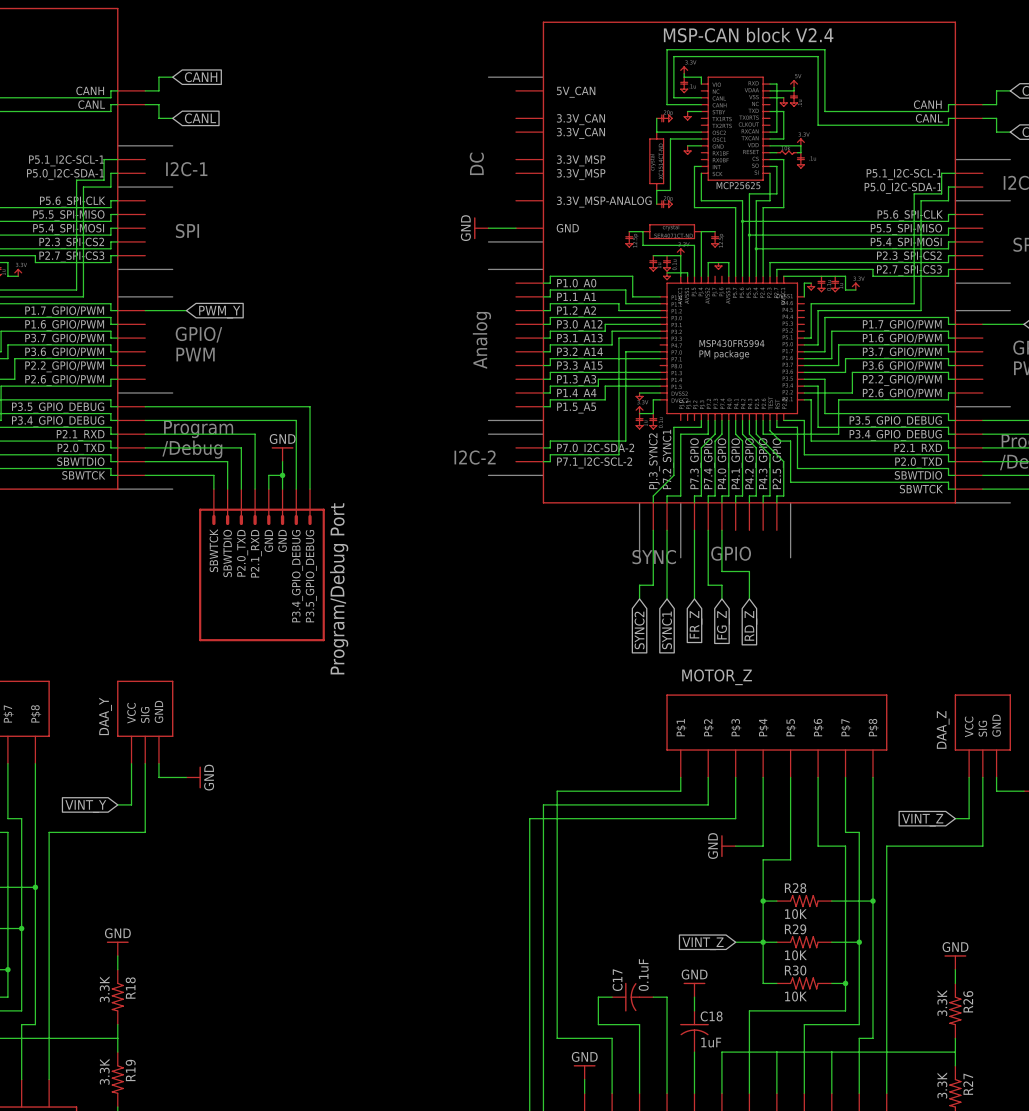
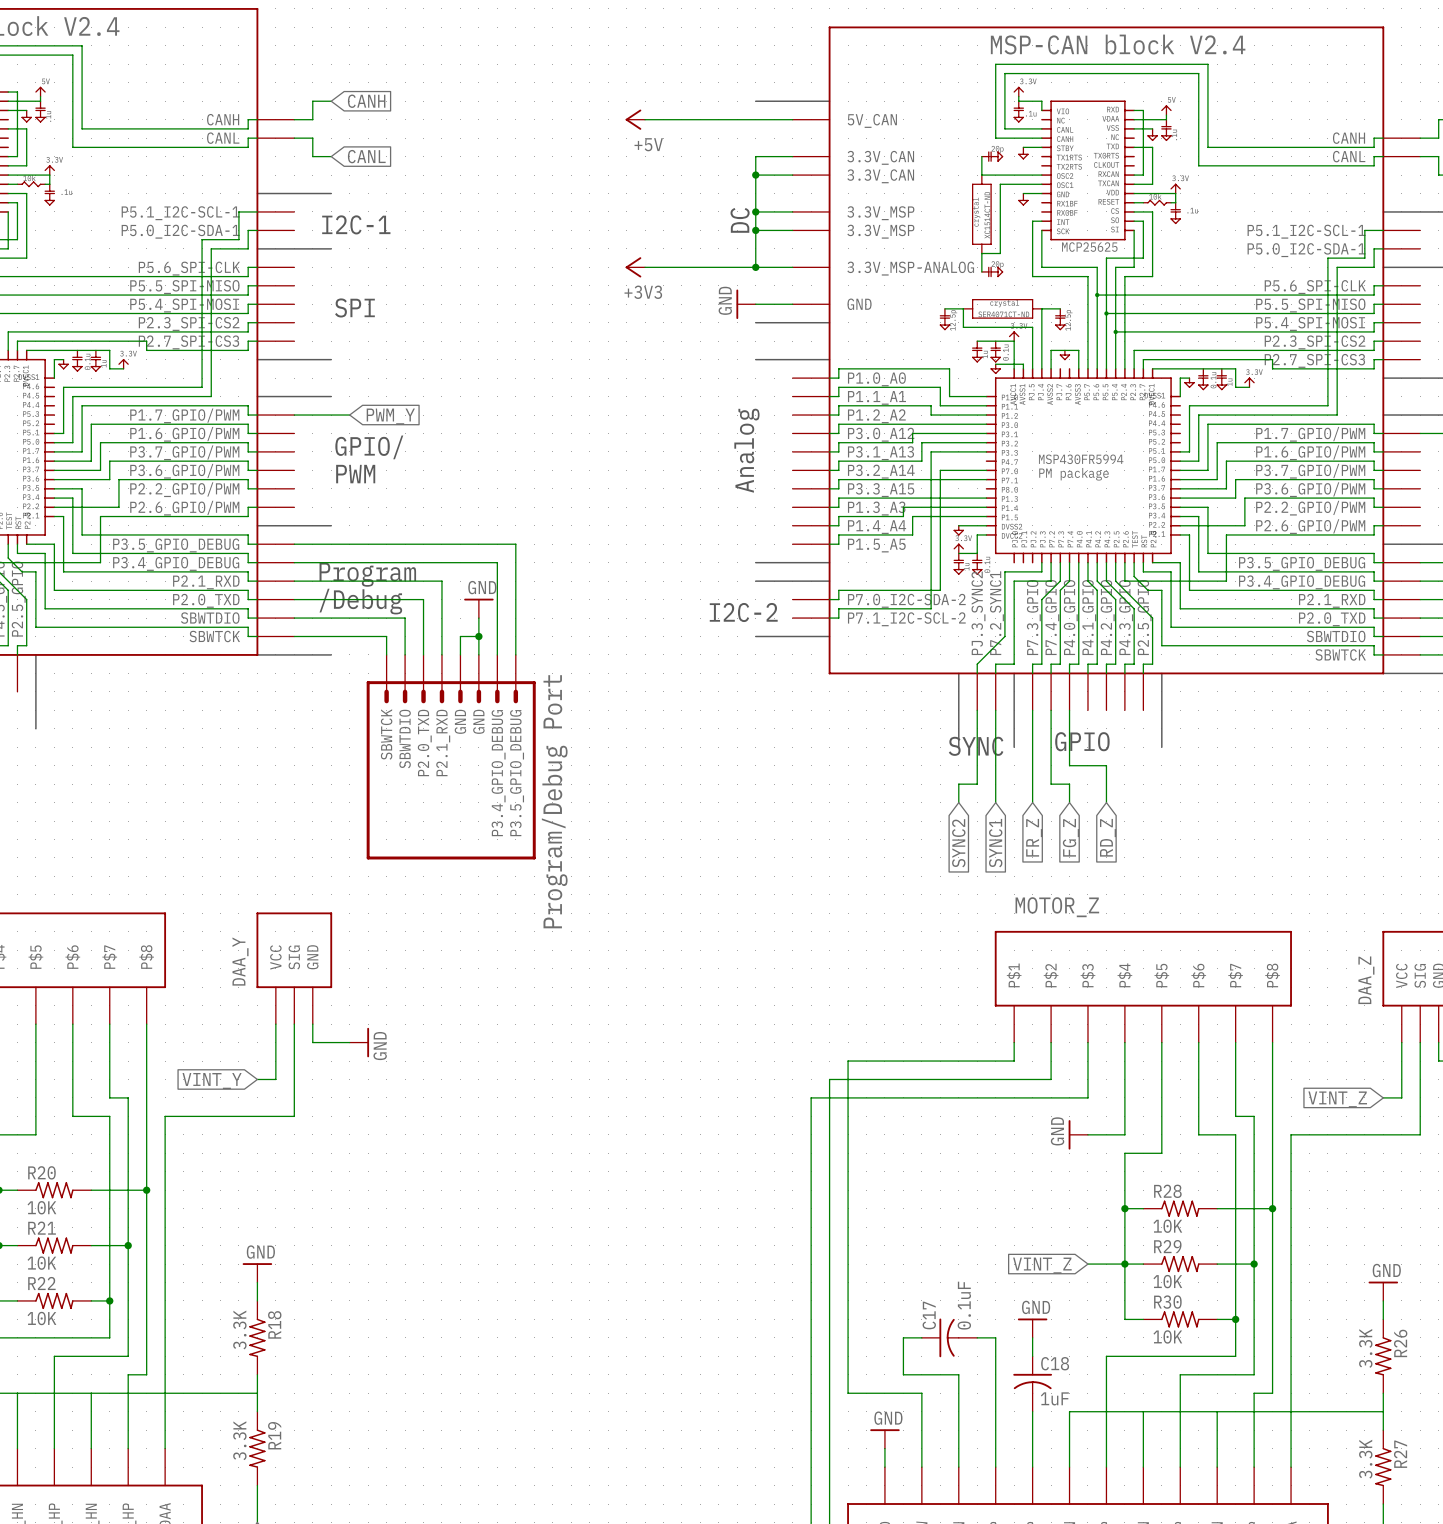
power symbol: none -> +5V (635, 119)
wire: none -> (645, 119) (792, 119)
wire: none -> (792, 156) (755, 156) (755, 267)
wire: none -> (755, 175) (792, 175)
junction: none -> (755, 175)
wire: none -> (755, 211) (792, 211)
junction: none -> (755, 211)
wire: none -> (755, 230) (792, 230)
junction: none -> (755, 230)
power symbol: none -> +3V3 (635, 267)
wire: none -> (645, 267) (792, 267)
junction: none -> (755, 267)

